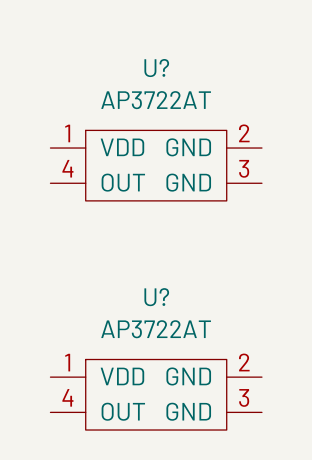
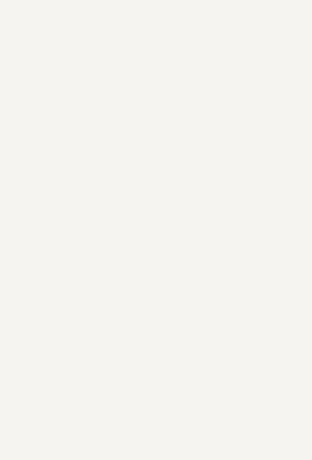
U?: AP3722AT (156, 165) -> none
U?: AP3722AT (156, 394) -> none

